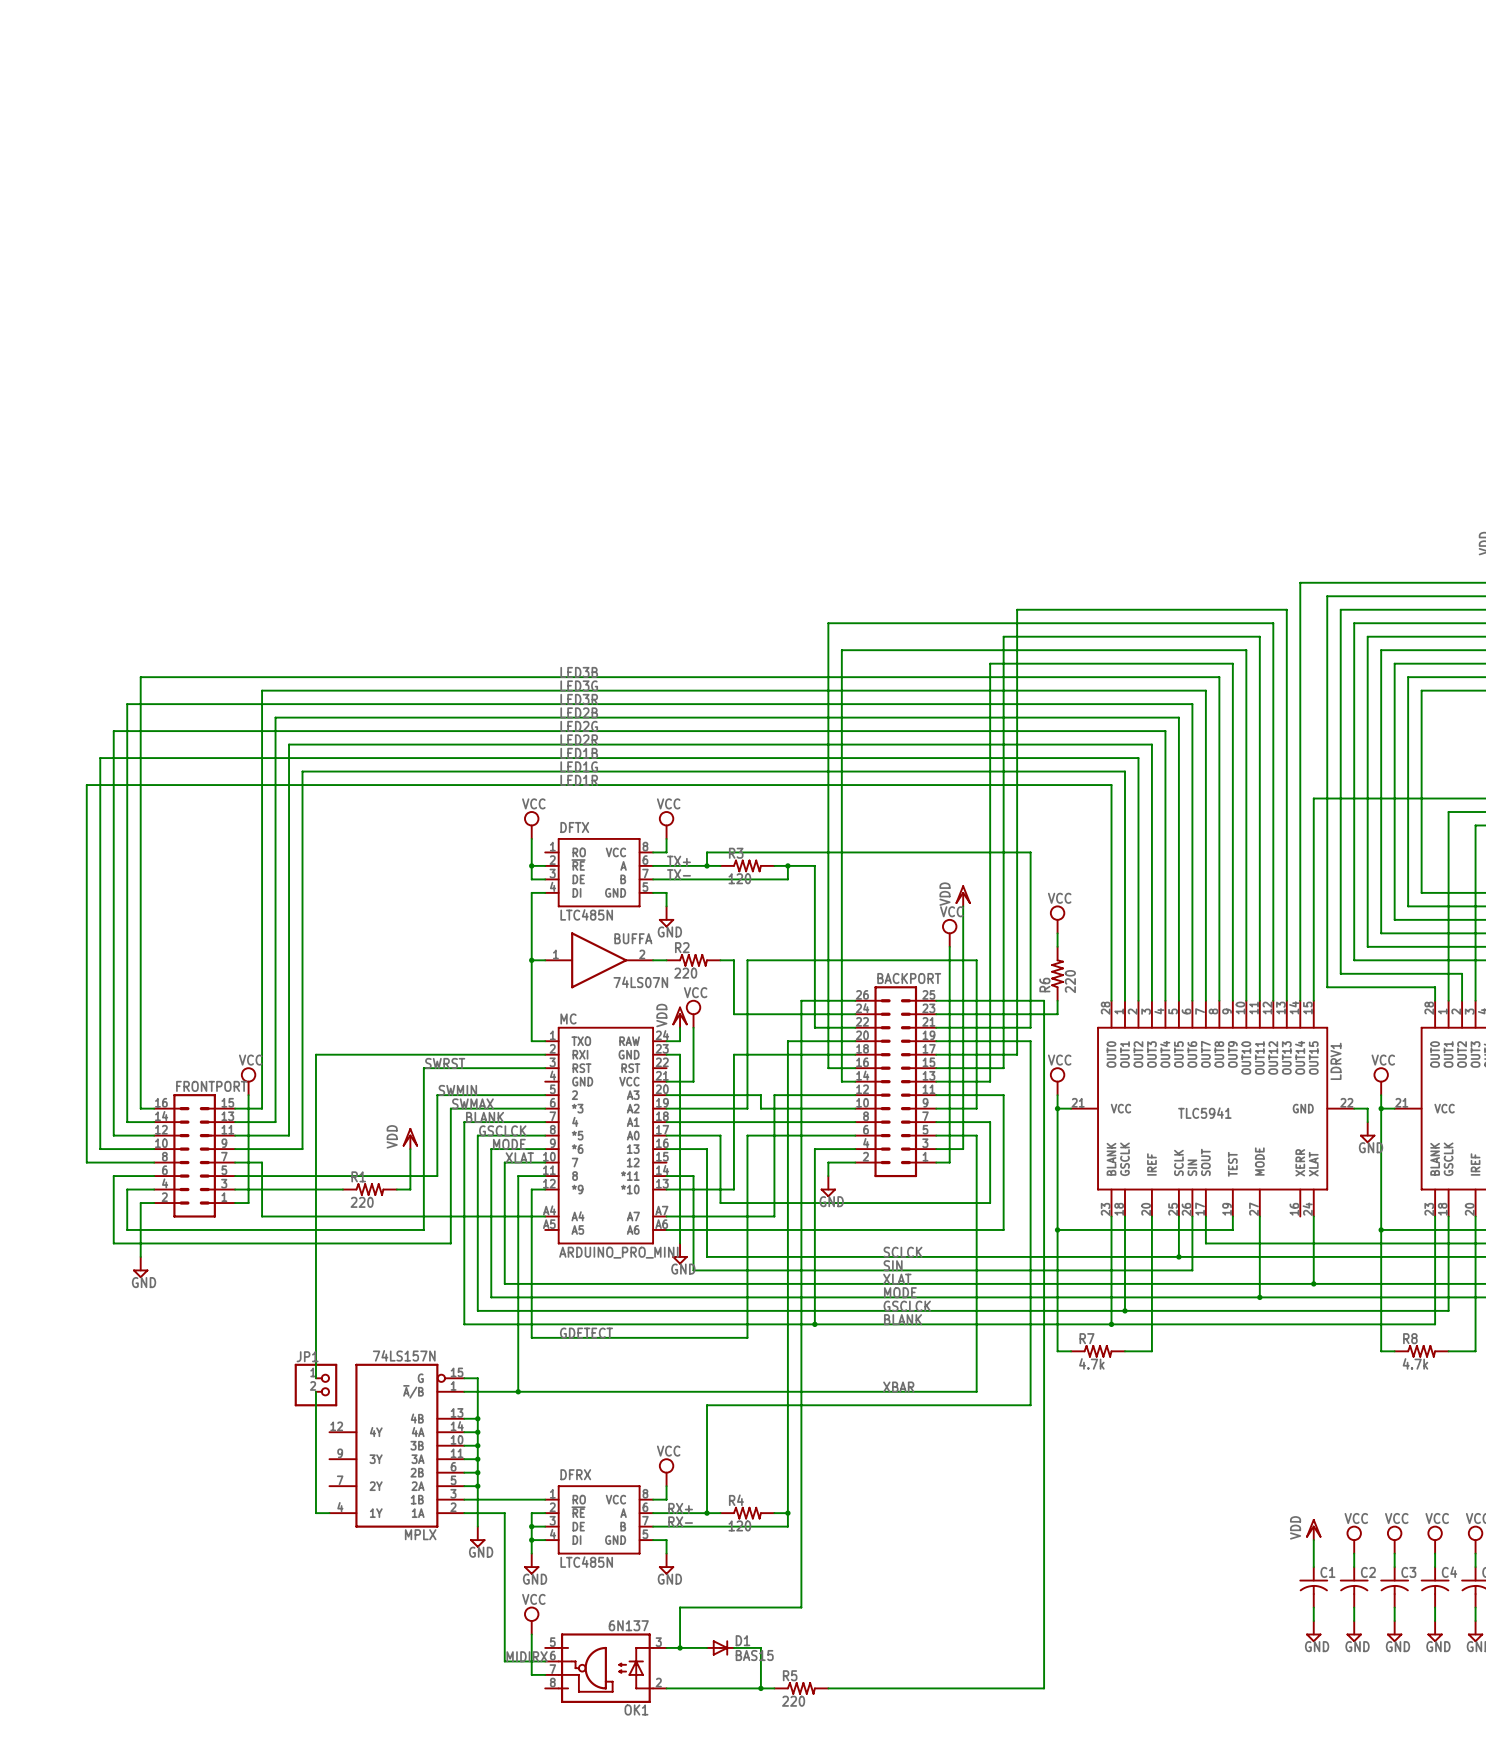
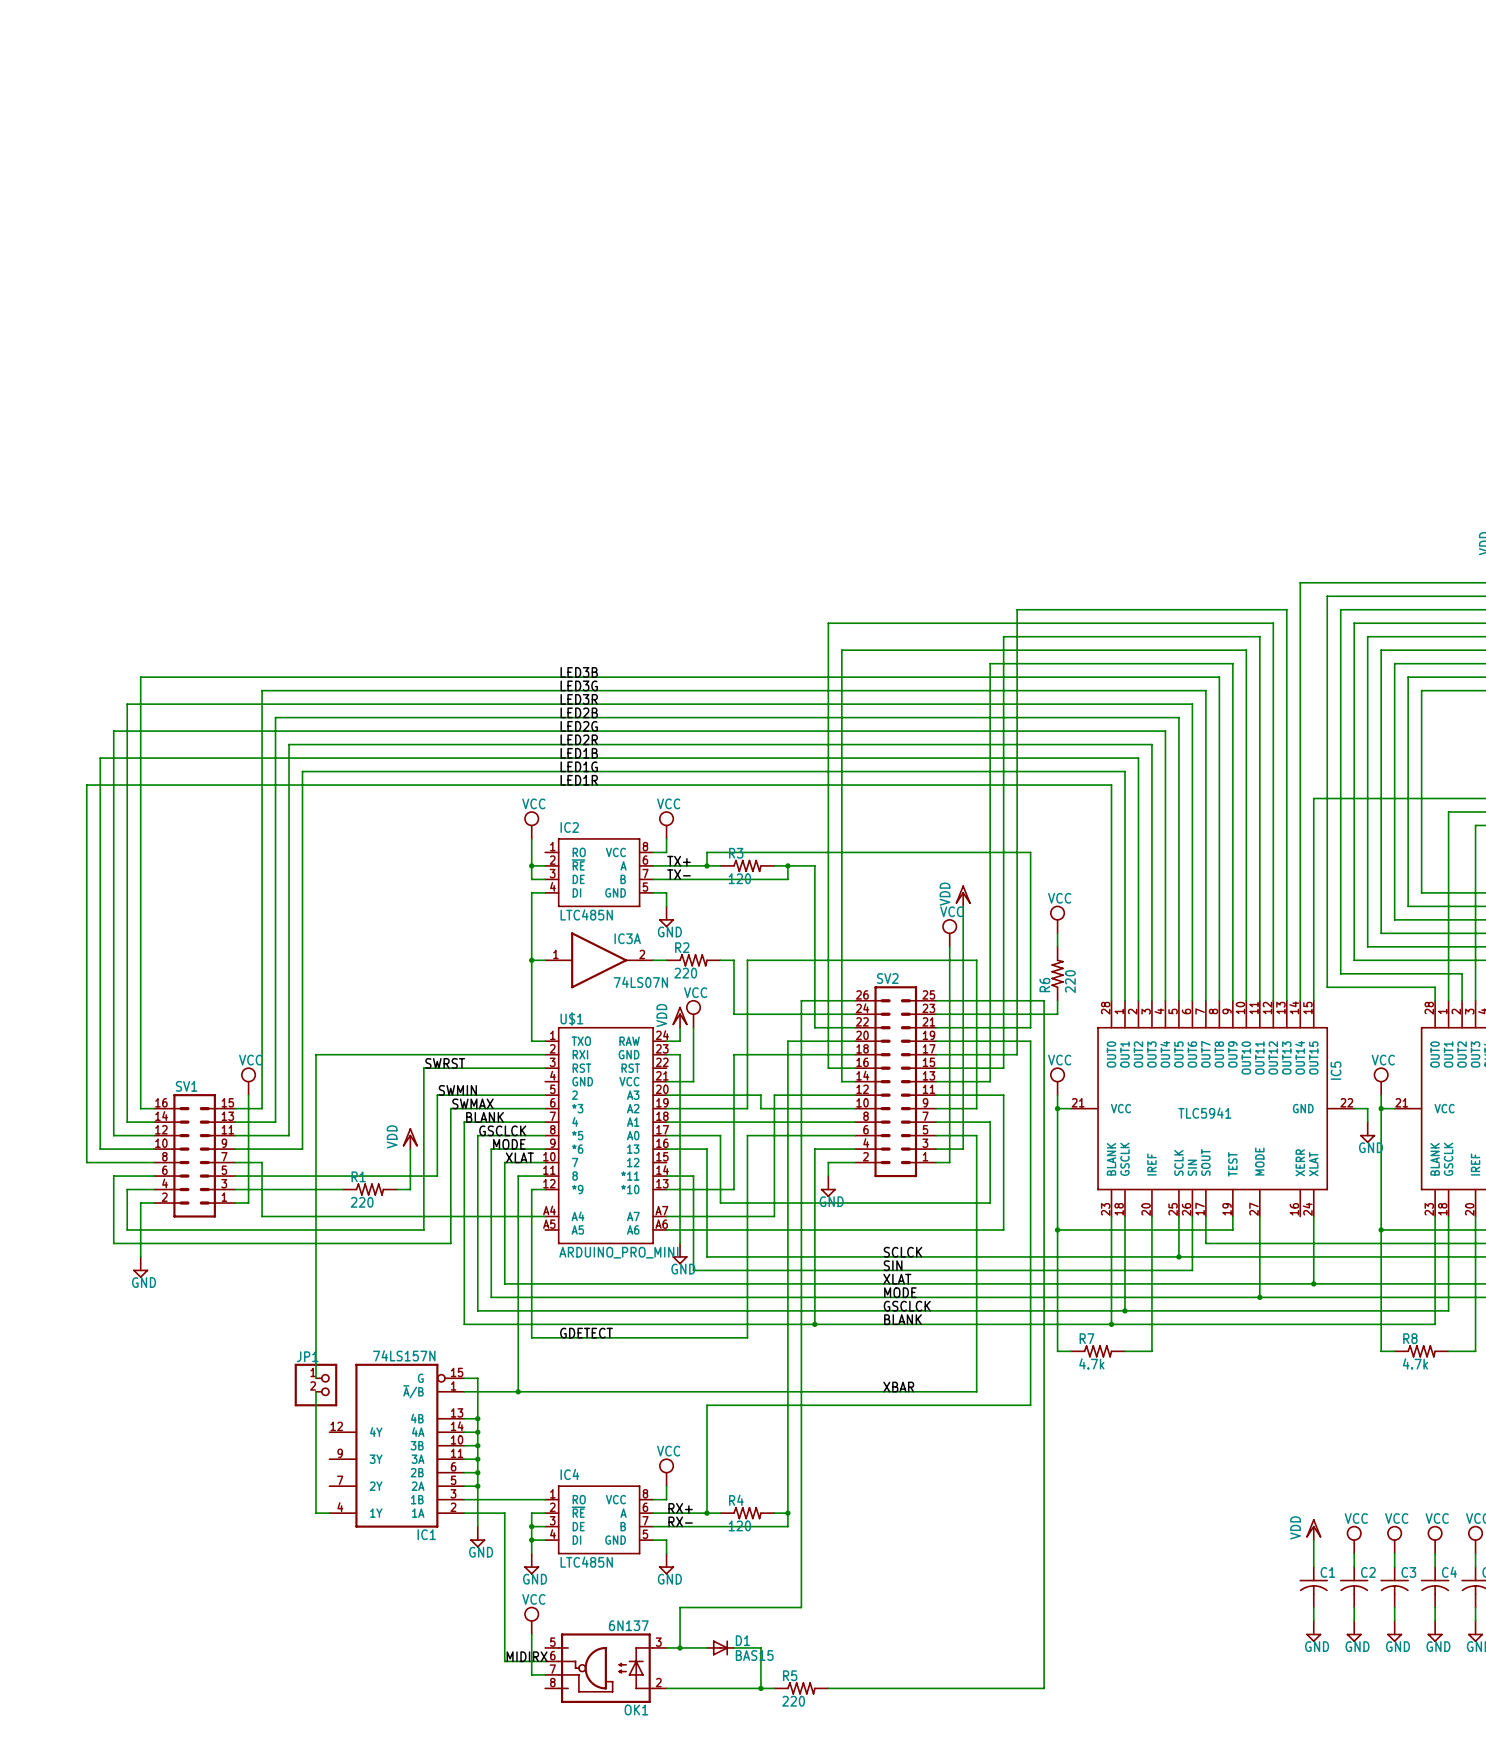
DFTX name: DFTX (574, 827) -> IC2 (569, 827)
BUFFA name: BUFFA (633, 938) -> IC3A (627, 938)
BACKPORT name: BACKPORT (909, 978) -> SV2 (887, 978)
MC name: MC (568, 1018) -> U$1 (571, 1018)
LDRV1 name: LDRV1 (1336, 1061) -> IC5 (1336, 1070)
FRONTPORT name: FRONTPORT (211, 1086) -> SV1 (186, 1086)
DFRX name: DFRX (575, 1474) -> IC4 (569, 1474)
MPLX name: MPLX (420, 1534) -> IC1 (426, 1534)

